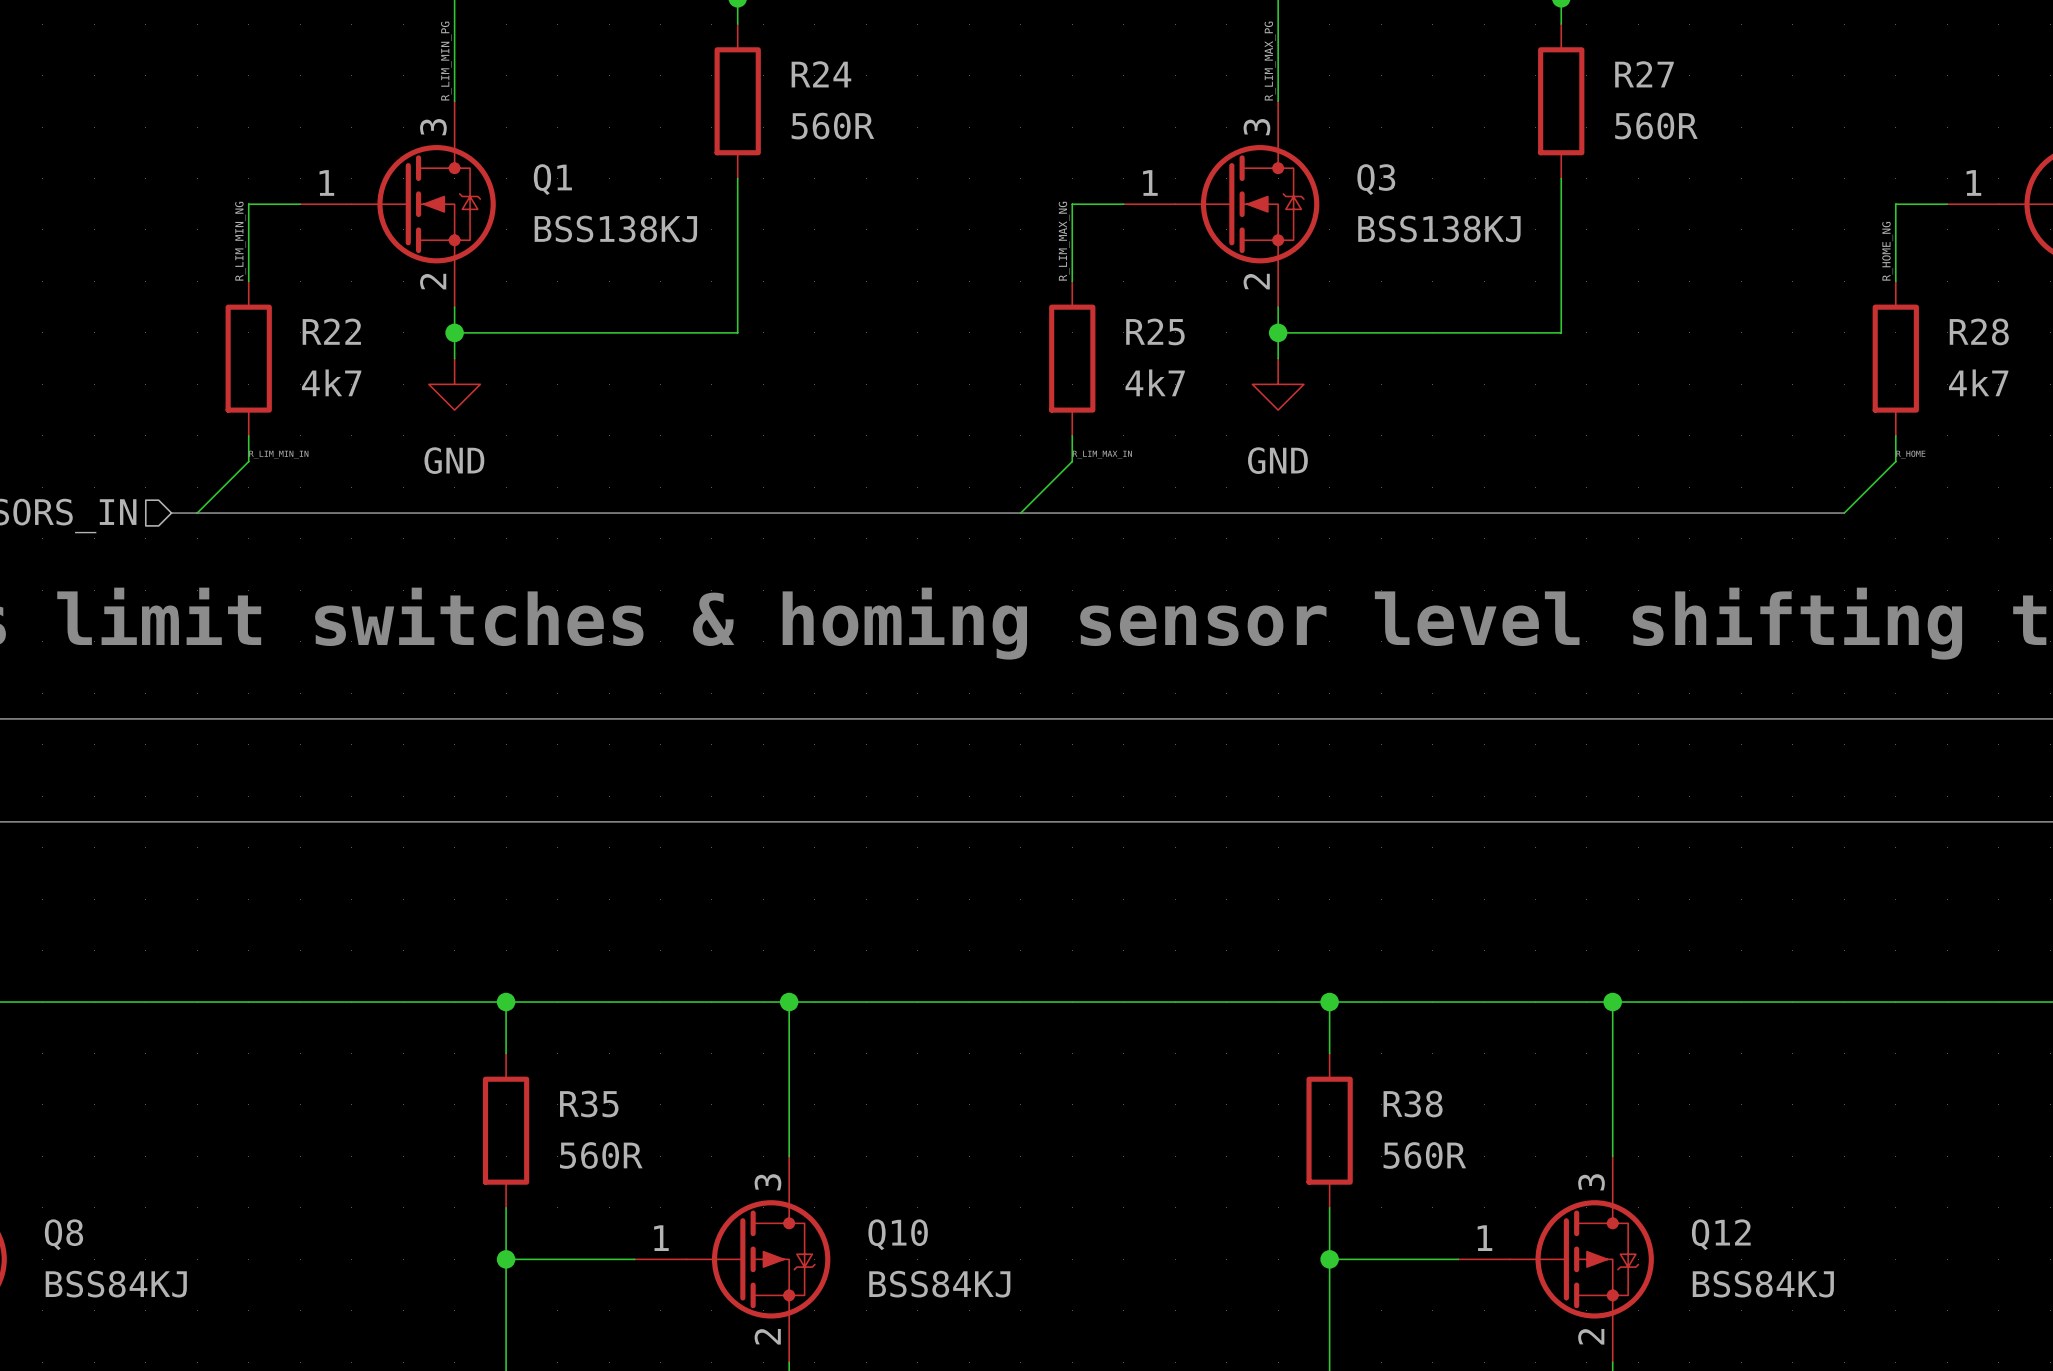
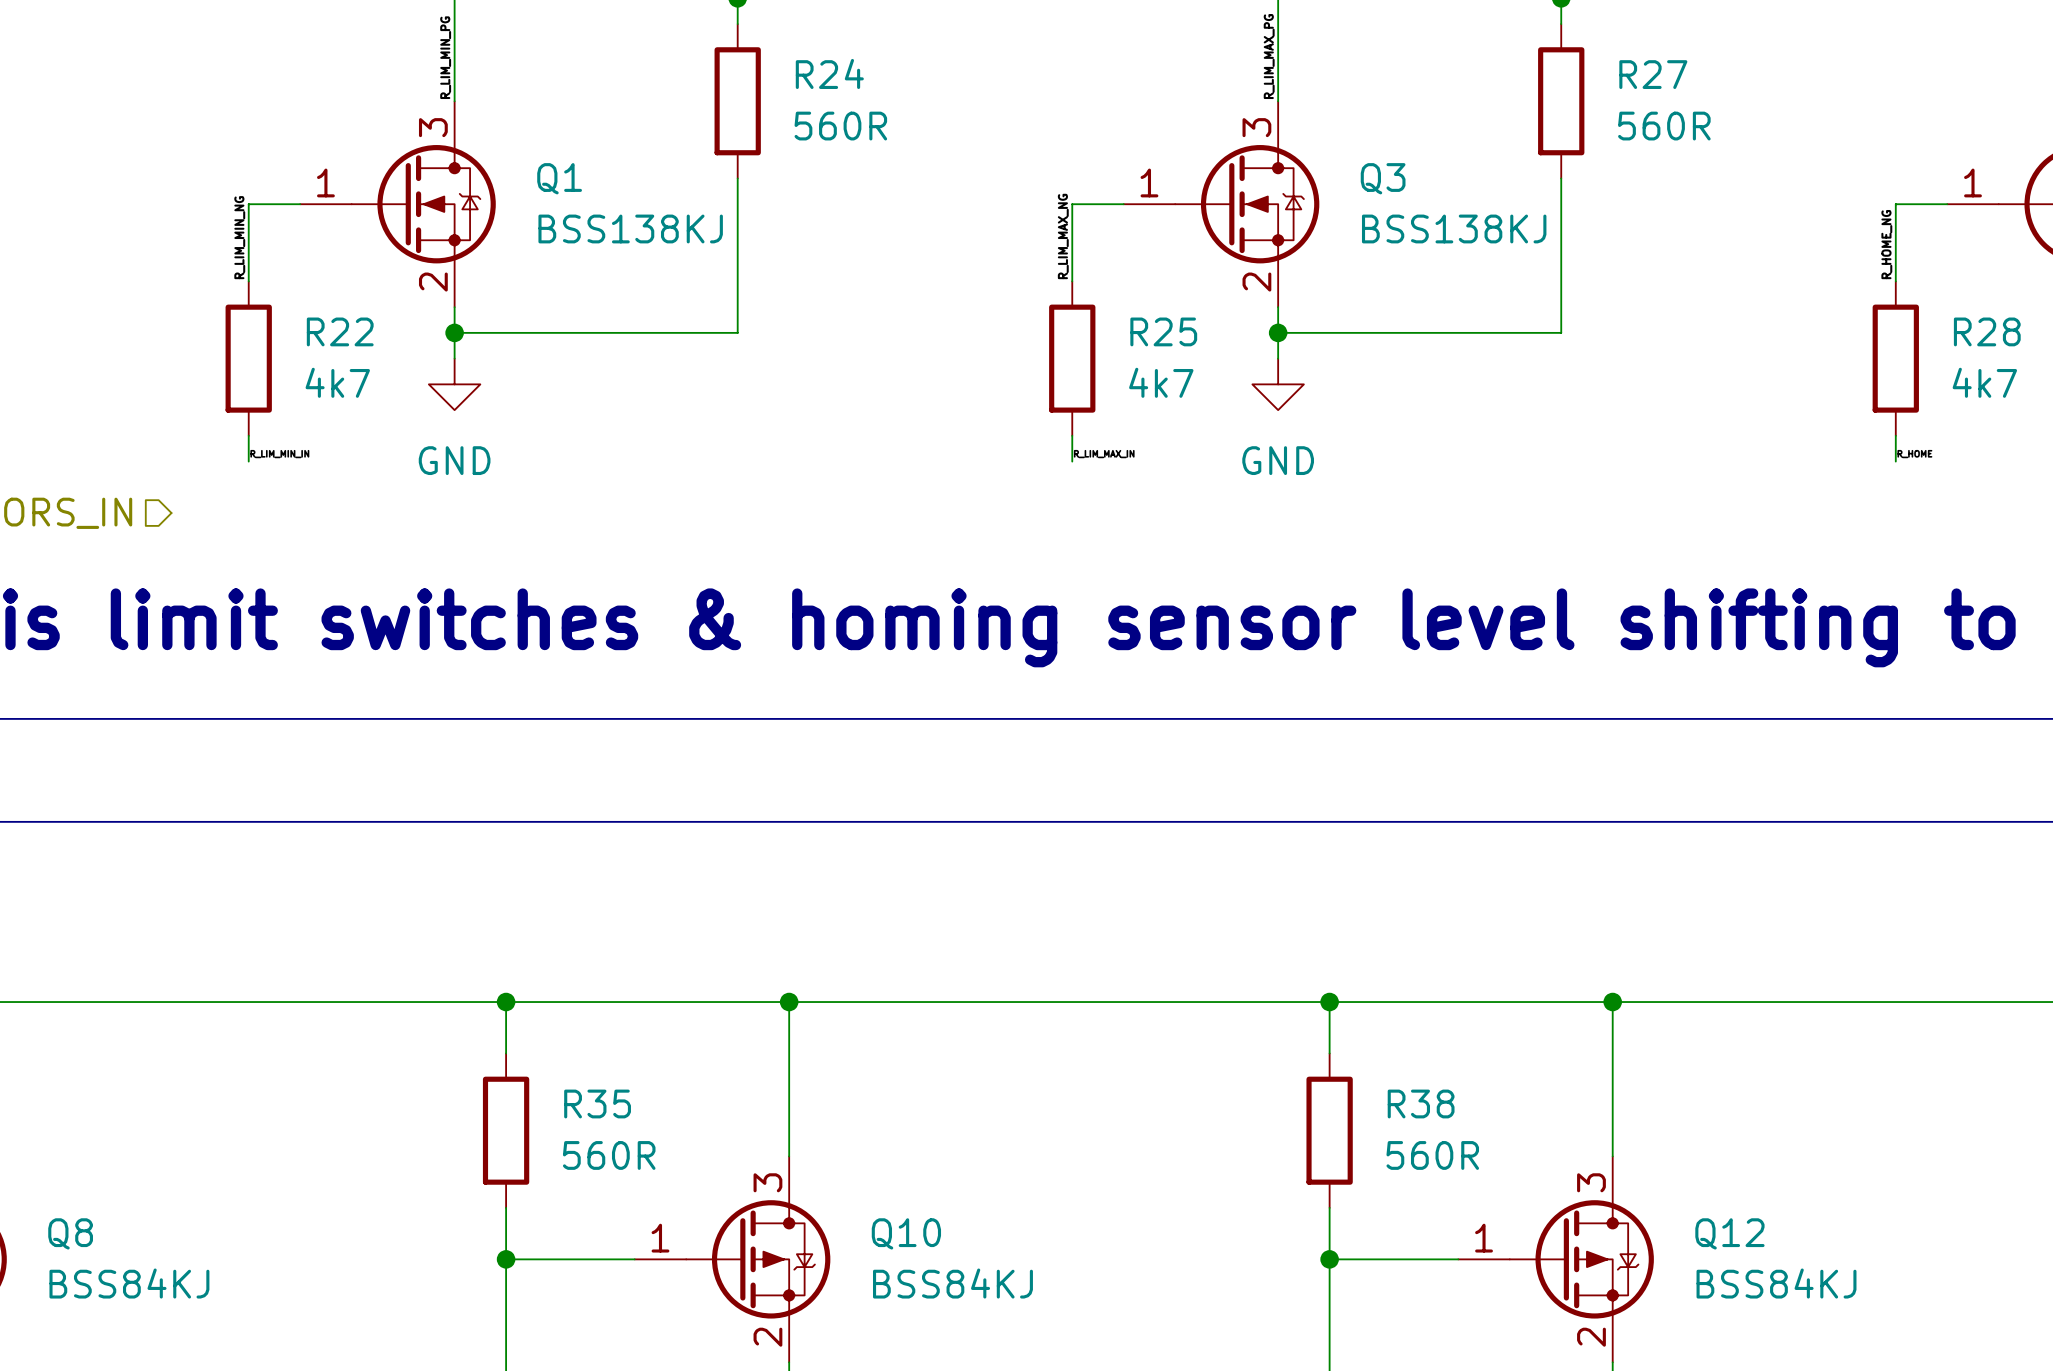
wire: (248, 461) (197, 513) -> none
wire: (1072, 461) (1020, 513) -> none
wire: (1895, 461) (1844, 513) -> none
bus: (171, 513) (1844, 513) -> none

